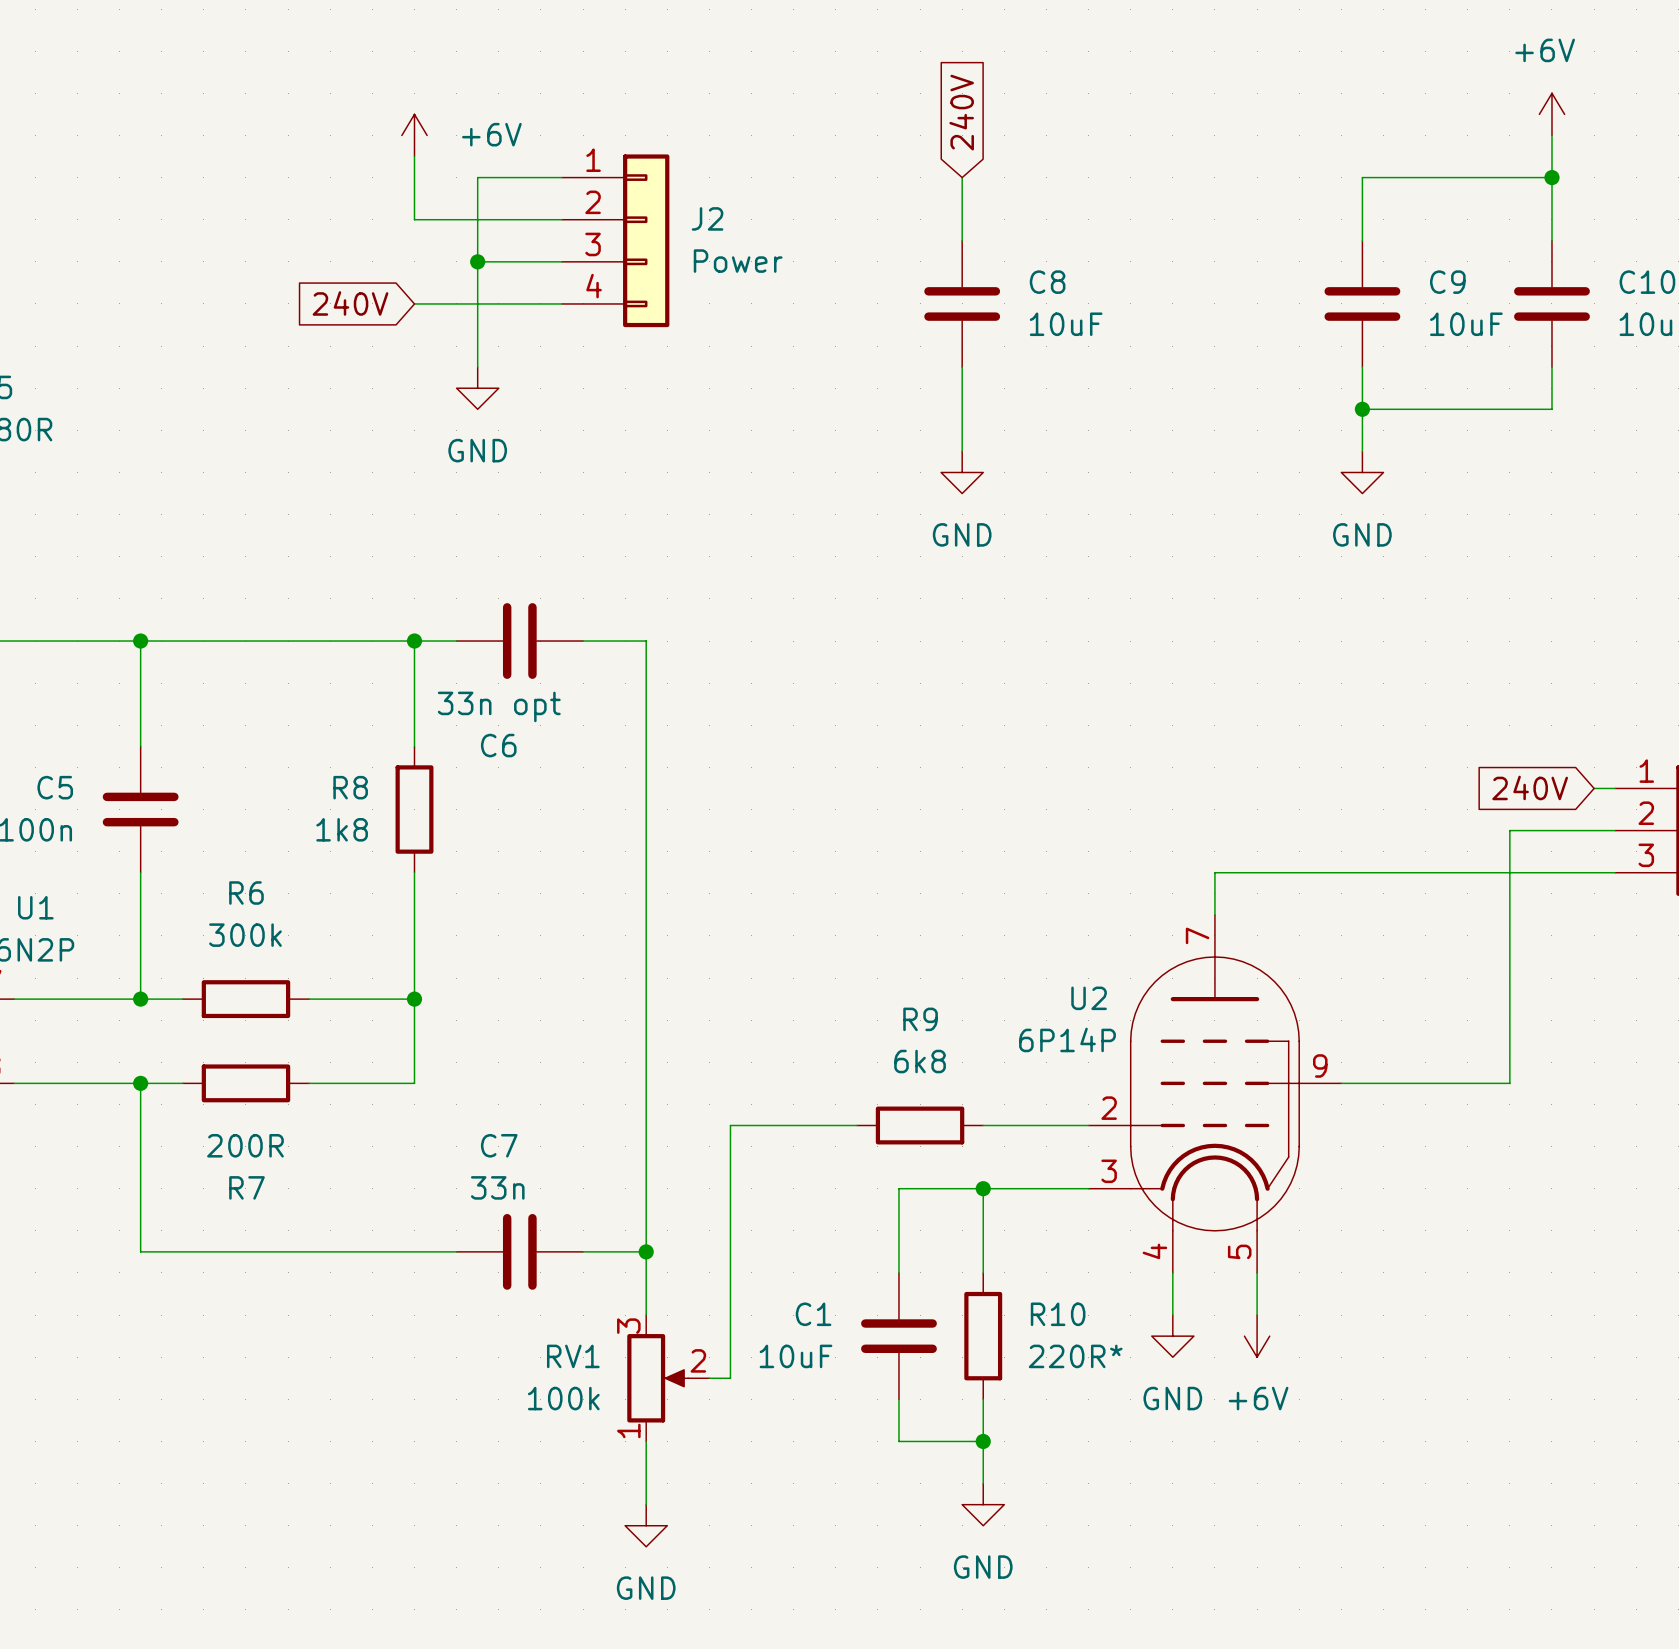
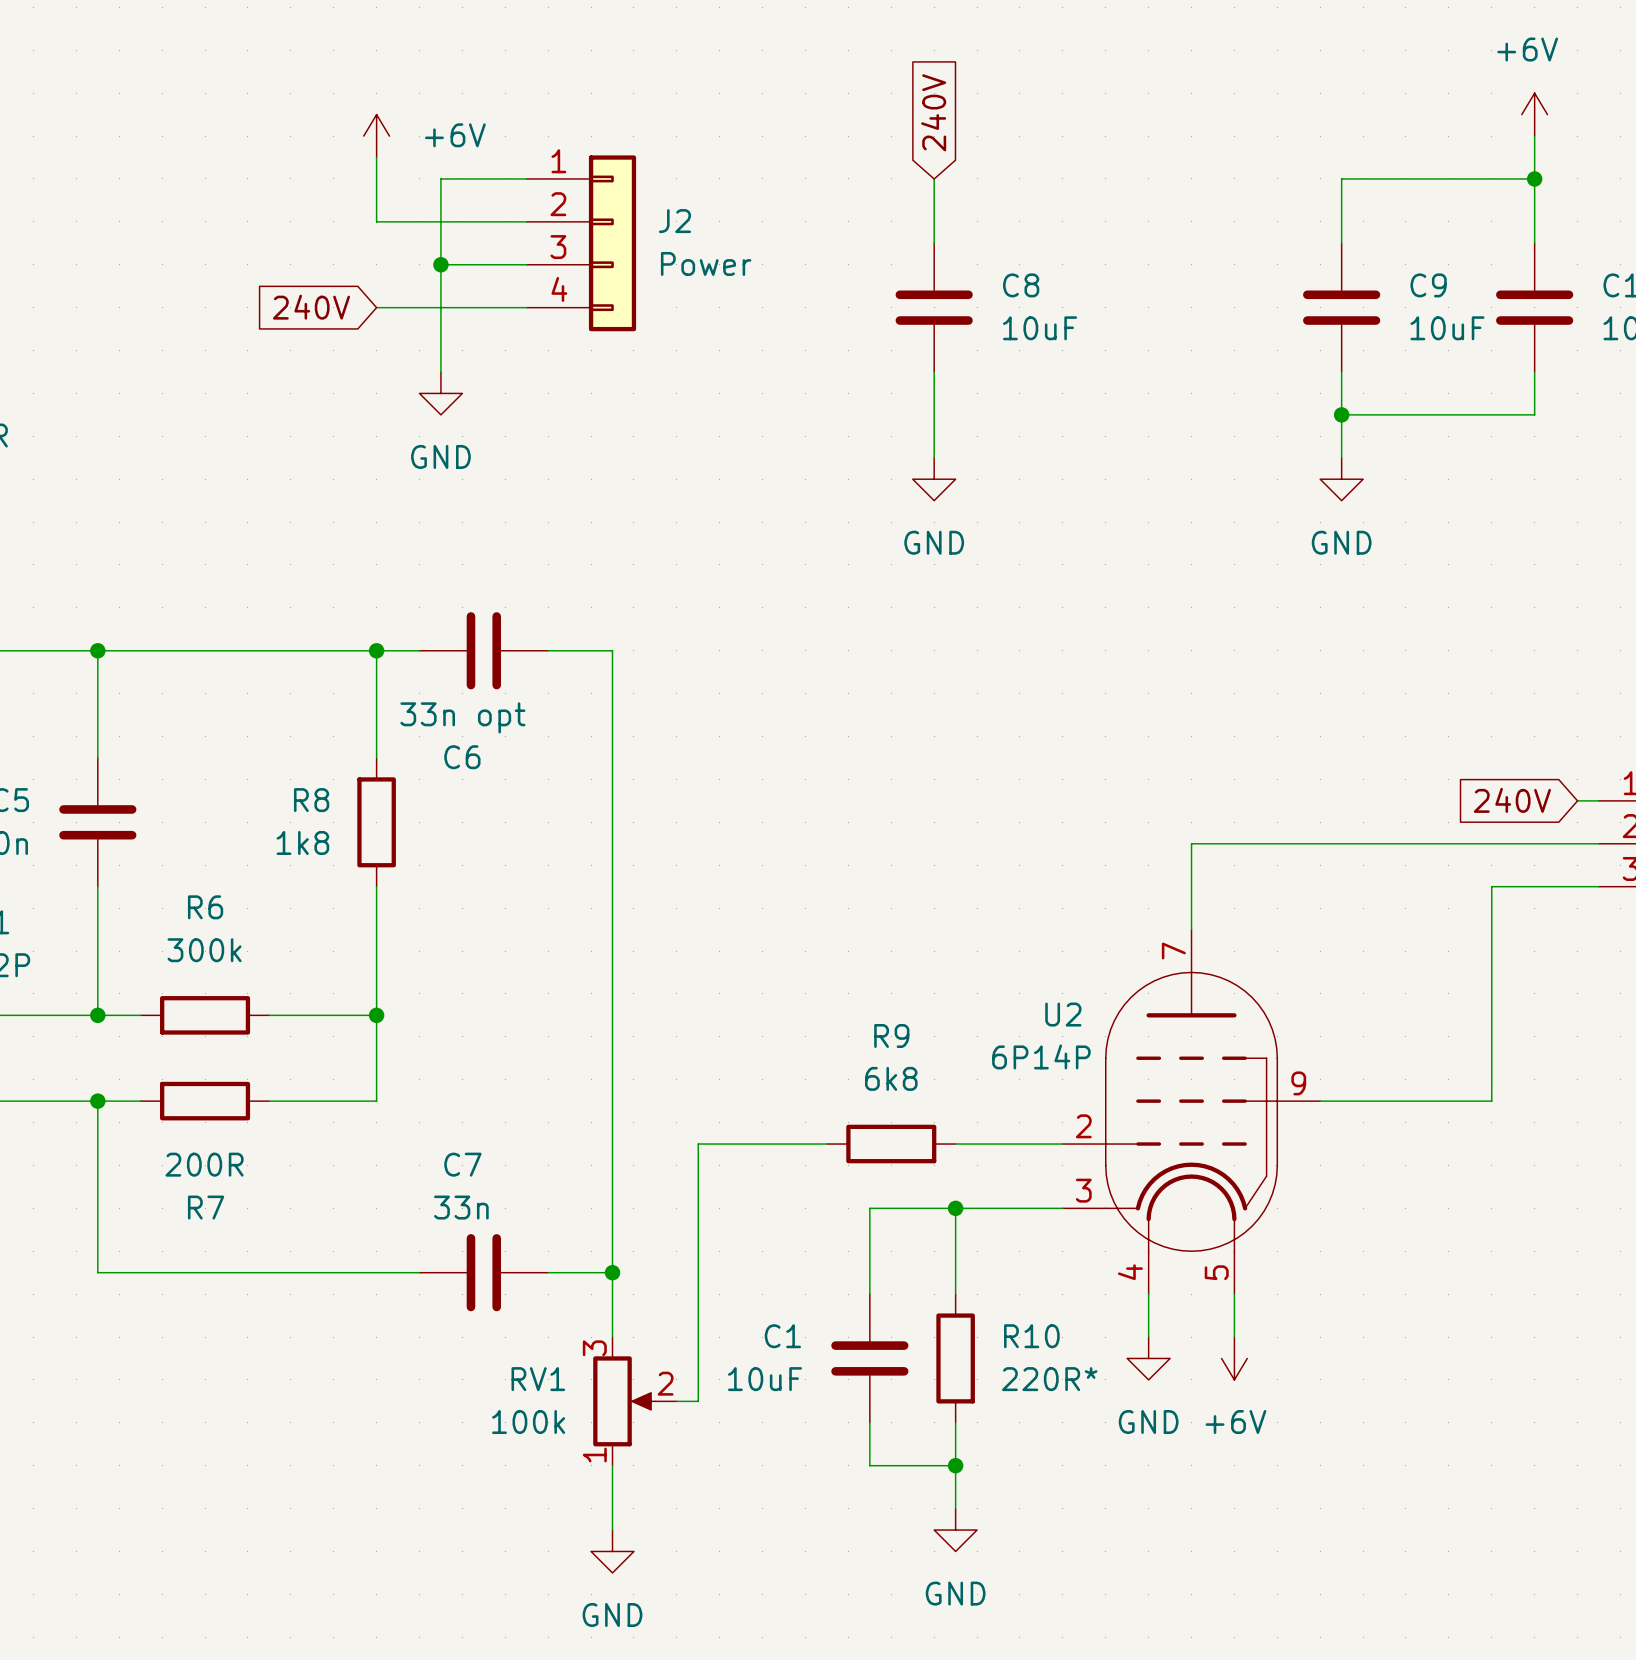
wire: (1509, 830) (1509, 872) (1214, 872) -> (1491, 843) (1191, 843) (1191, 886)

